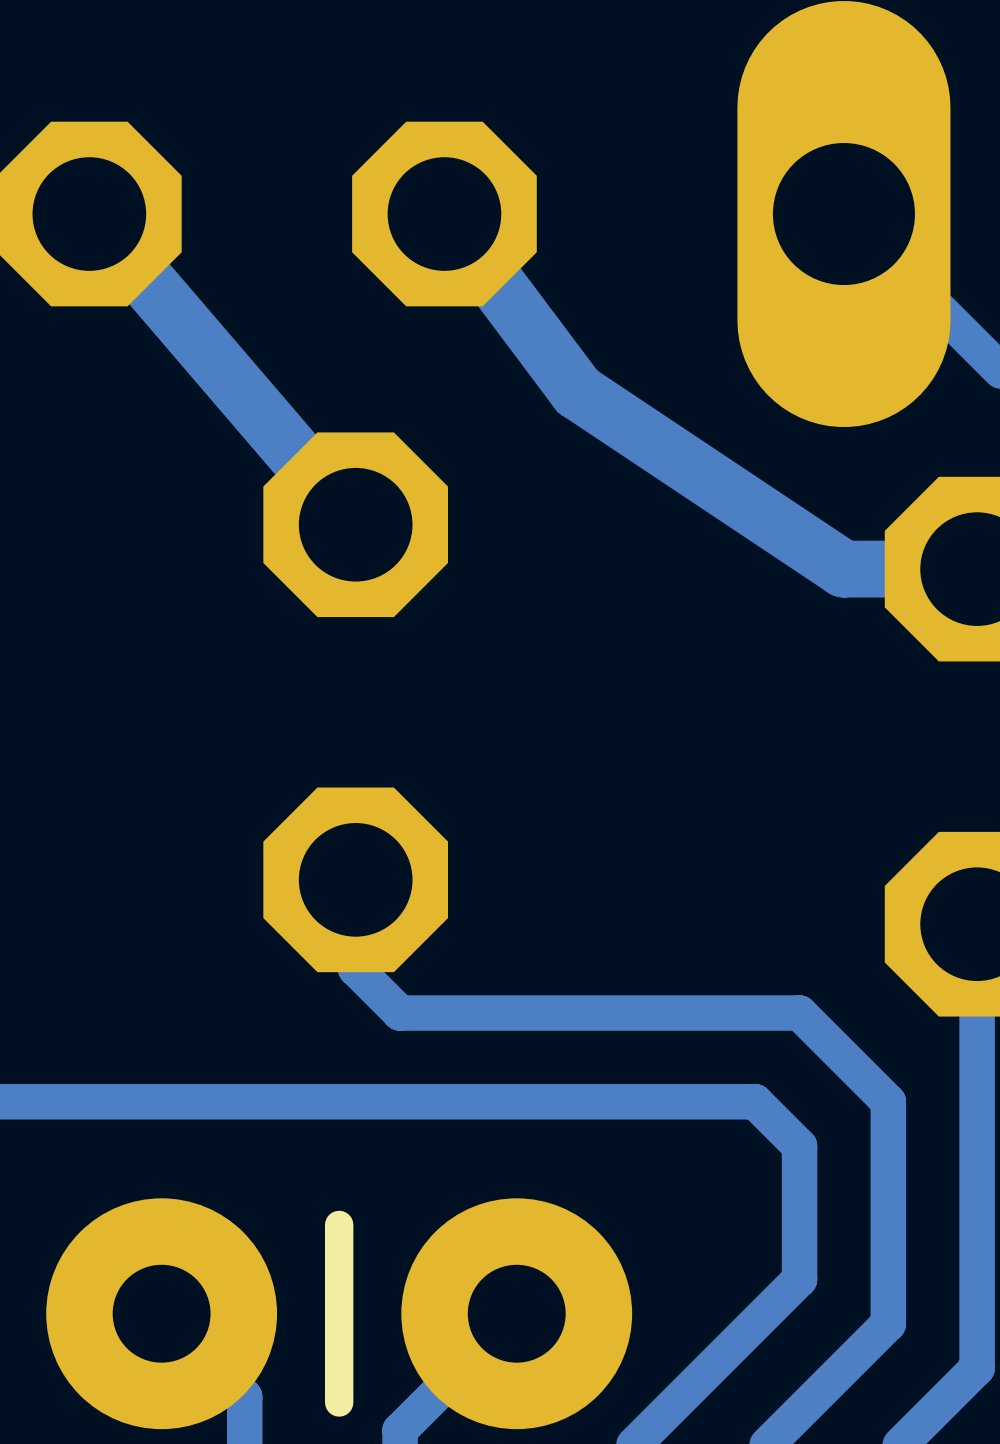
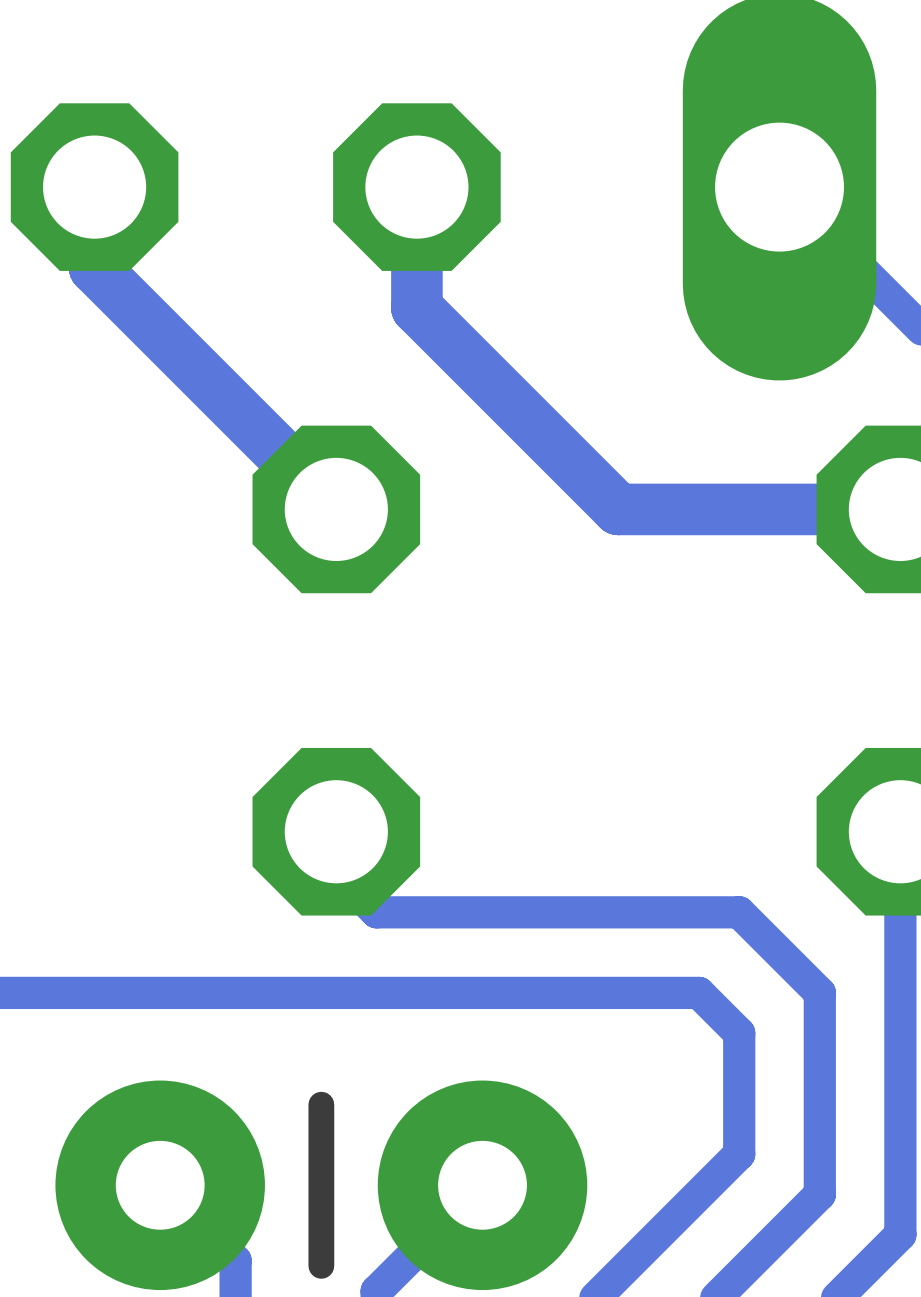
bottom track: (89, 214) (355, 524) -> (94, 187) (94, 267) (336, 509)
bottom track: (444, 214) (577, 391) (843, 569) -> (416, 187) (416, 307) (618, 509) (779, 509)
part position: (355, 702) -> (336, 670)

